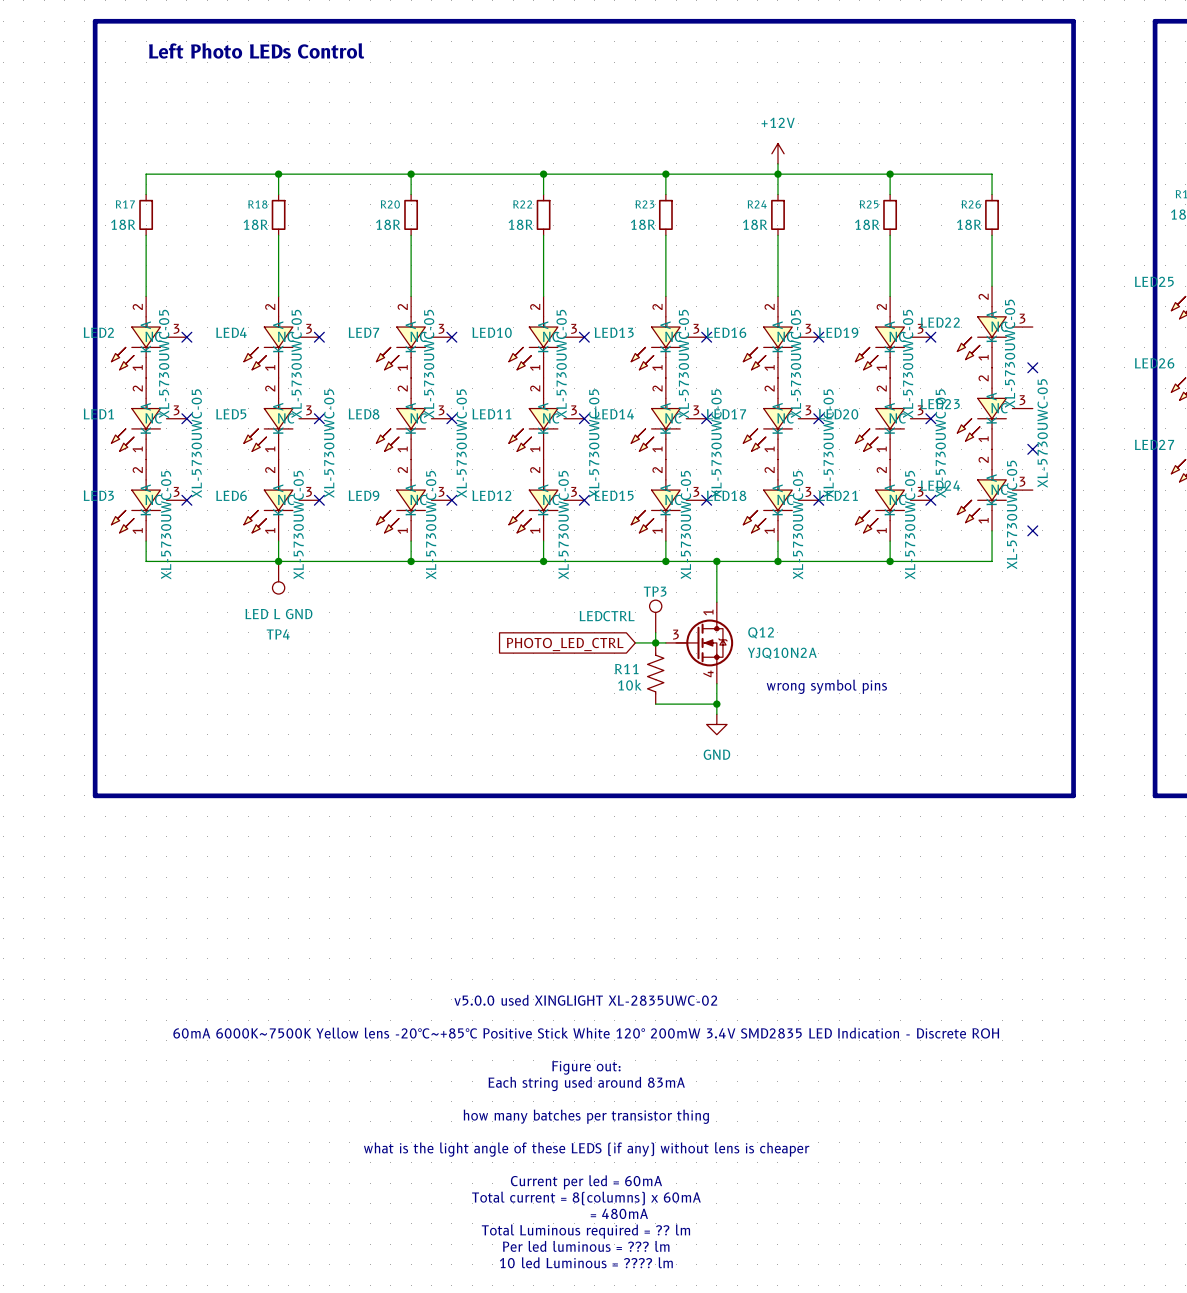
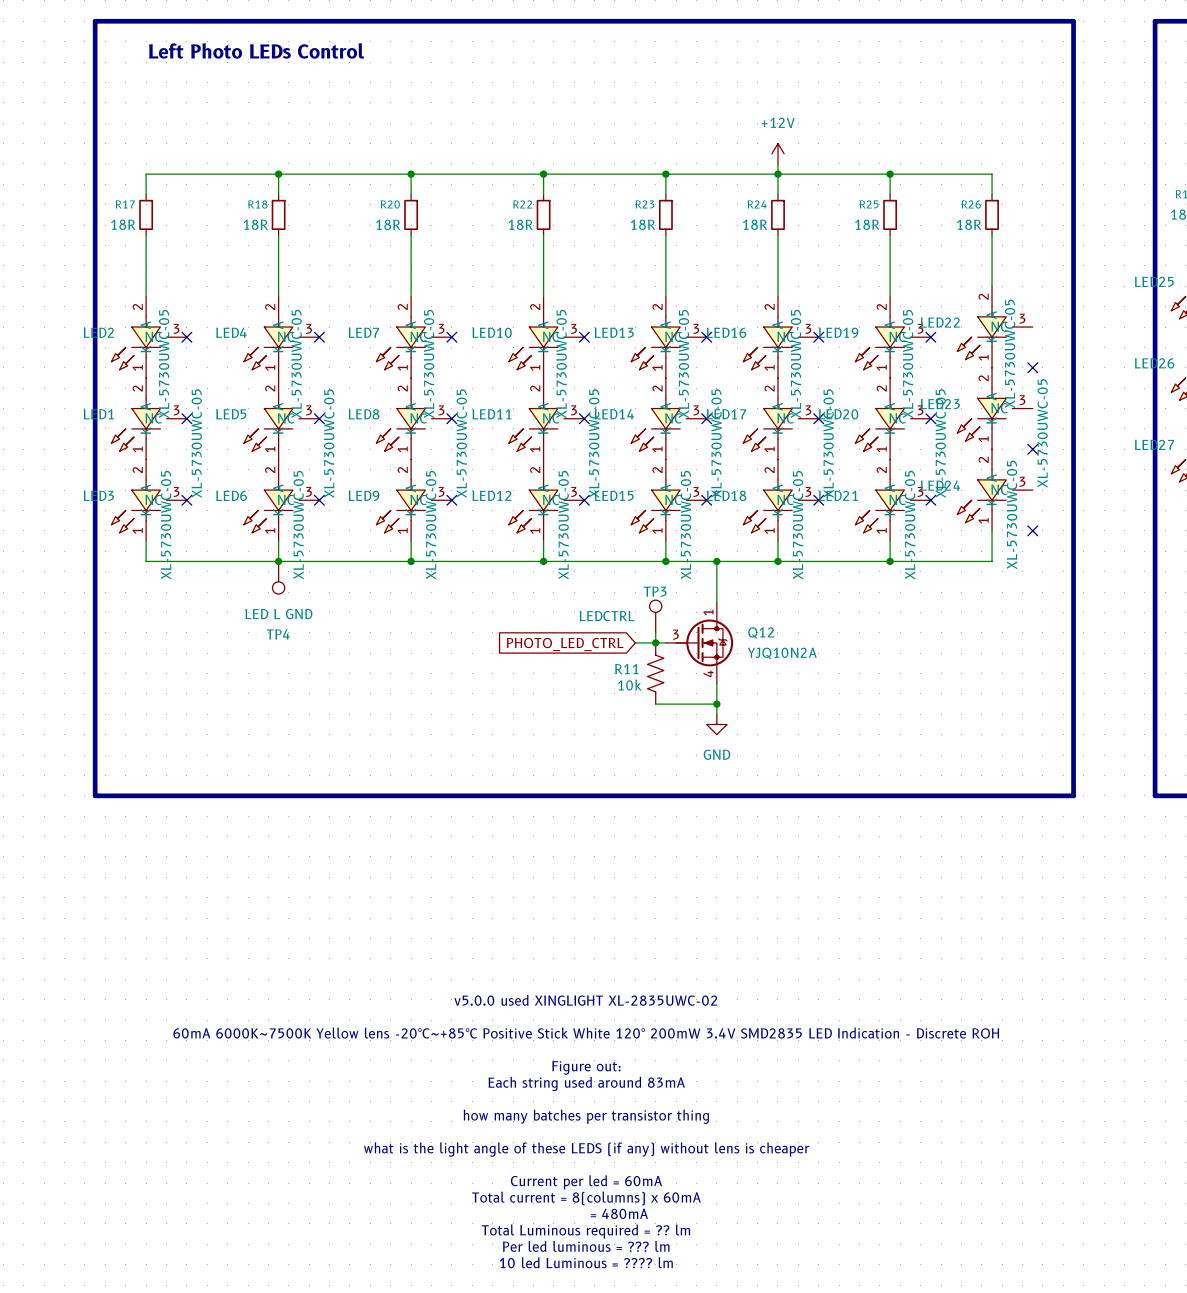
text: wrong symbol pins (826, 686) -> none

